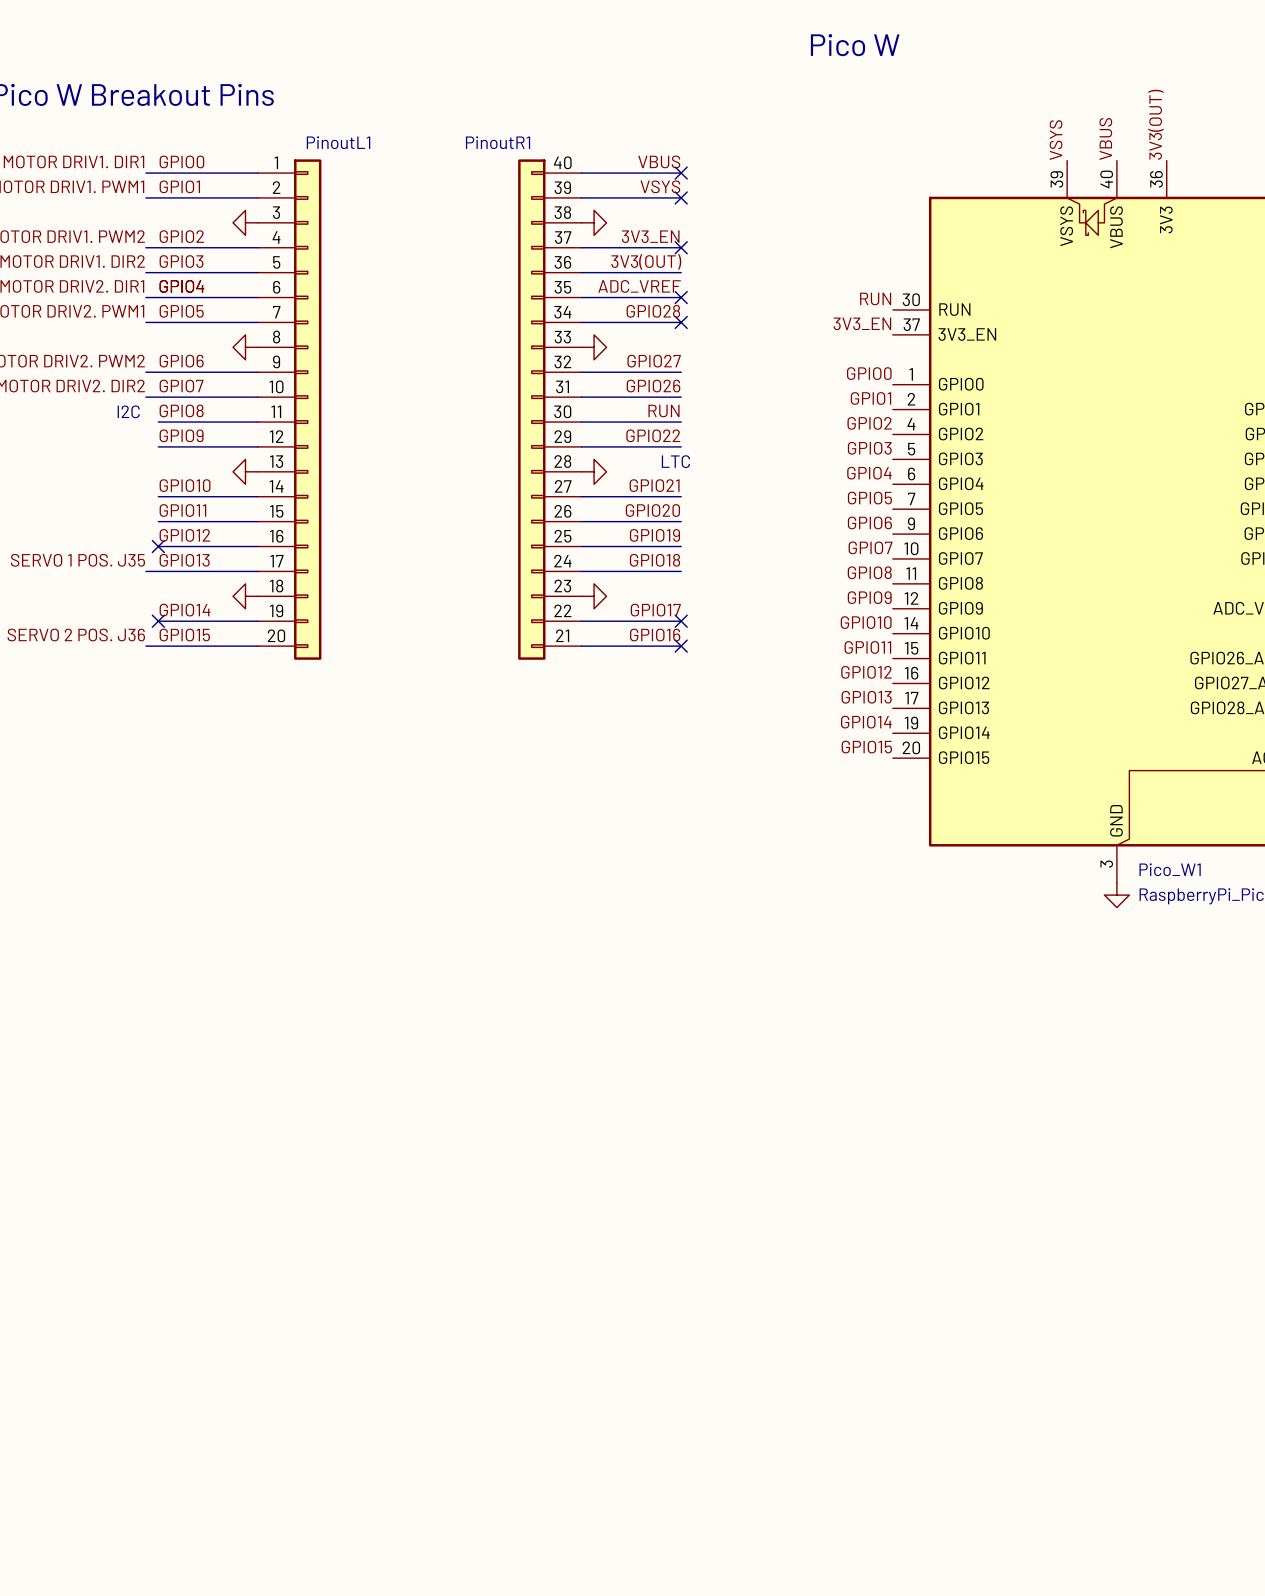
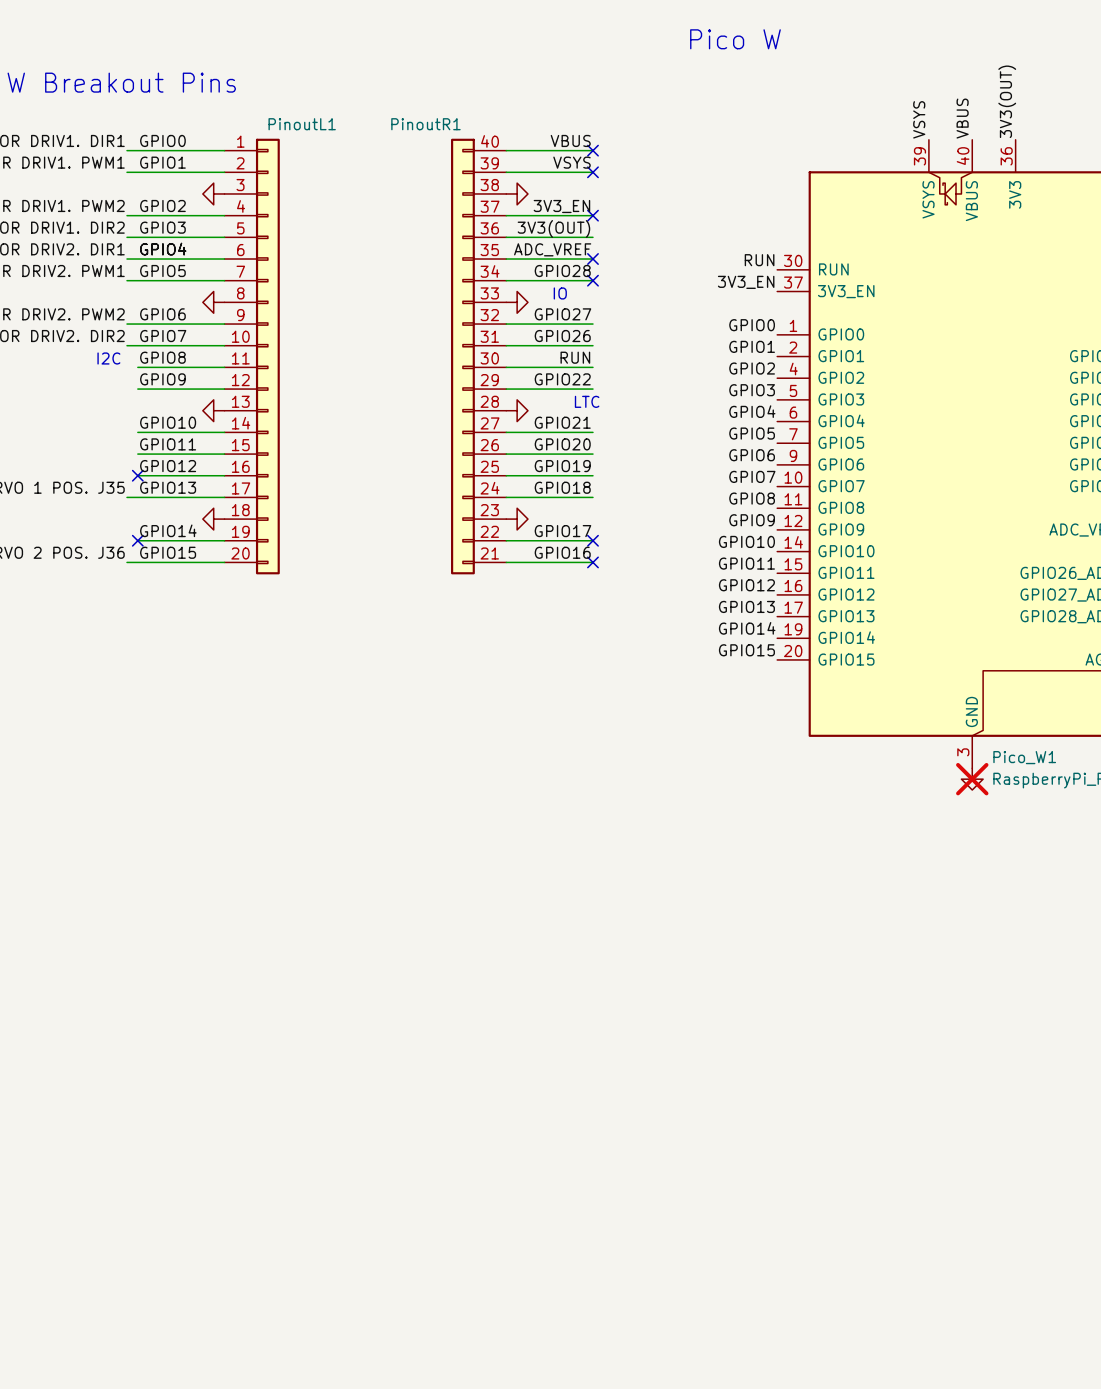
text: none -> IO (560, 293)
power symbol do-not-place cross: none -> (972, 779)

